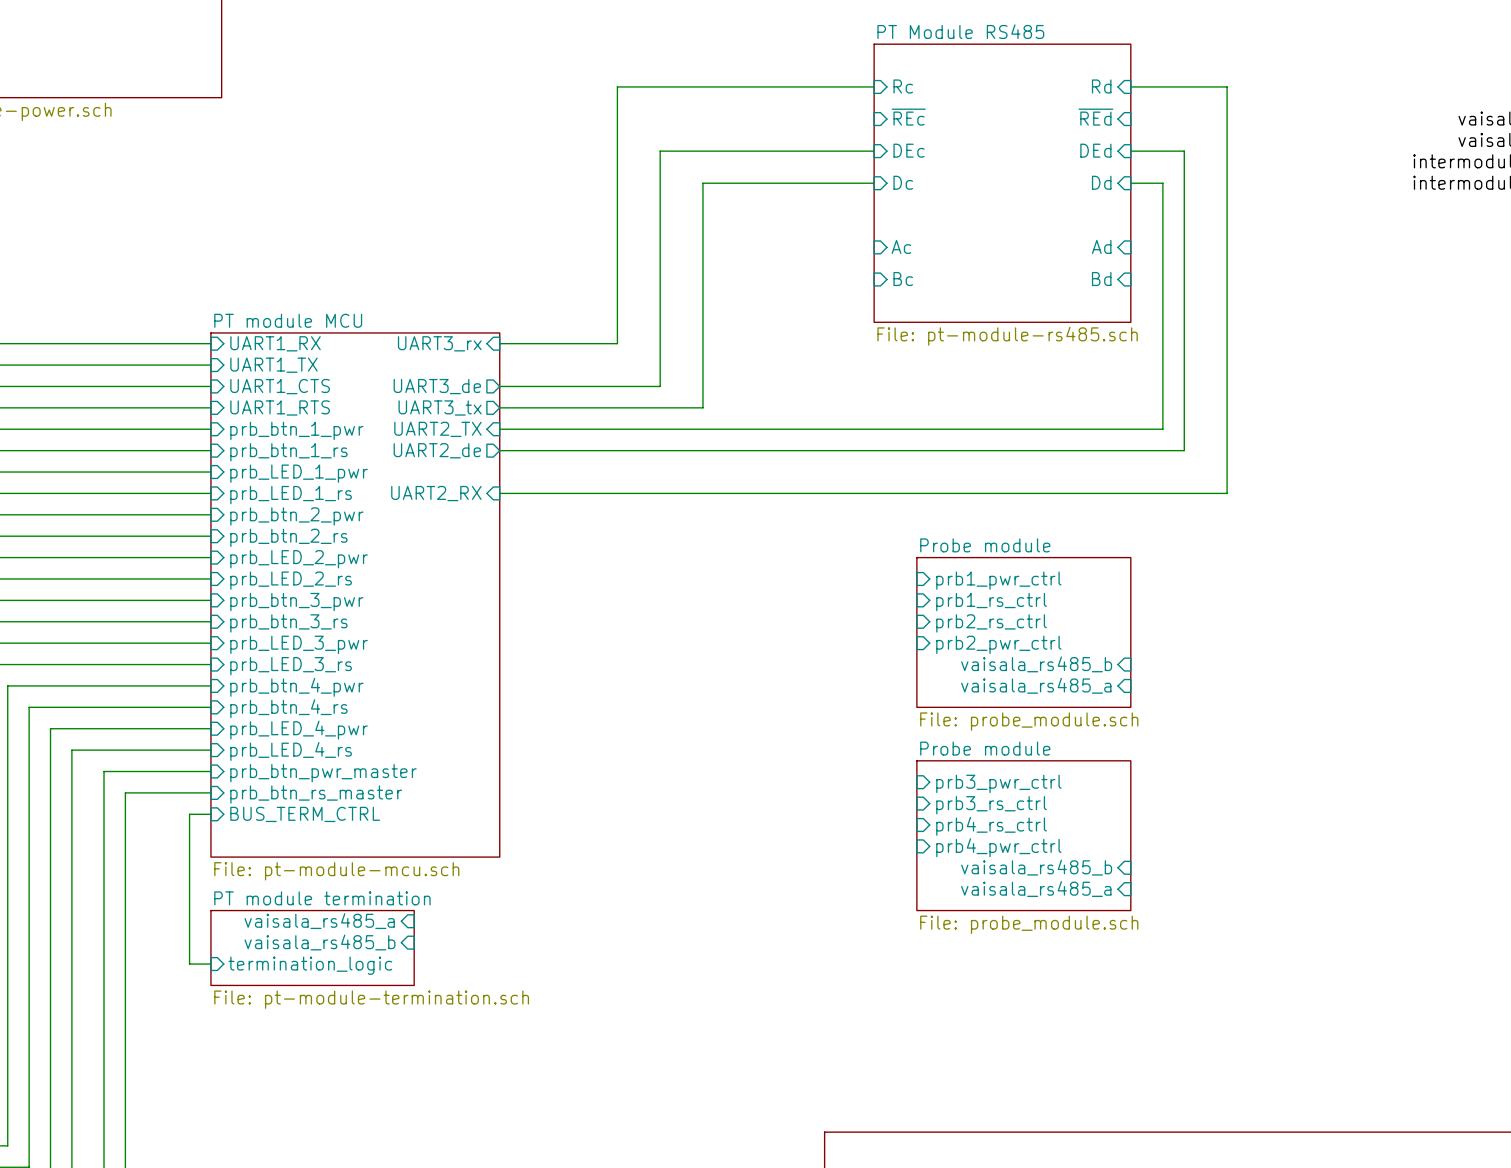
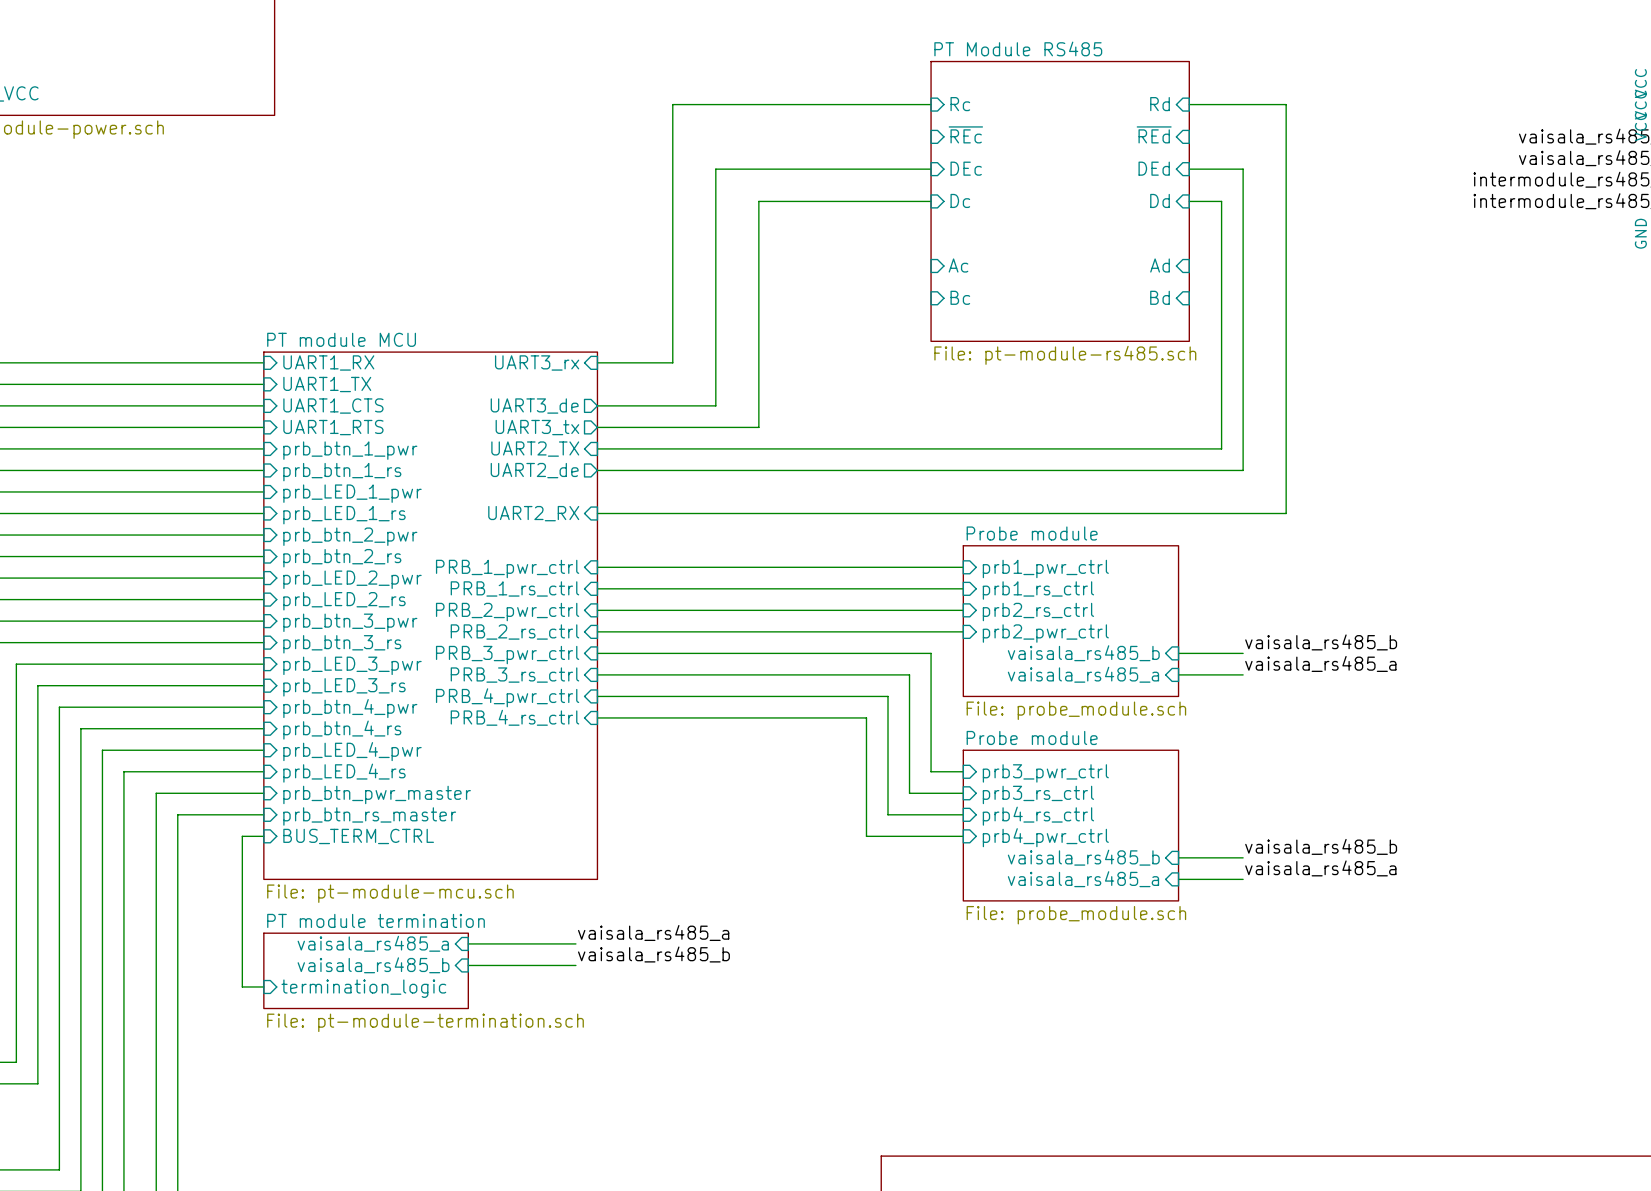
sheet pin position: UART3_rx (439, 343) -> UART3_rx (537, 362)
wire: (499, 343) (542, 343) -> none
sheet pin position: UART3_de (437, 386) -> UART3_de (534, 406)
wire: (499, 386) (542, 386) -> none
sheet pin position: UART3_tx (440, 407) -> UART3_tx (537, 427)
wire: (499, 407) (542, 407) -> none
sheet pin position: UART2_TX (437, 429) -> UART2_TX (535, 449)
wire: (499, 429) (542, 429) -> none
sheet pin position: UART2_de (437, 450) -> UART2_de (534, 470)
wire: (499, 450) (542, 450) -> none
sheet pin position: UART2_RX (436, 493) -> UART2_RX (533, 513)
wire: (499, 493) (542, 493) -> none
wire: none -> (597, 567) (963, 567)
sheet pin: none -> PRB_1_pwr_ctrl (507, 568)
sheet pin: none -> PRB_1_rs_ctrl (514, 588)
wire: none -> (597, 588) (963, 588)
sheet pin position: prb1_pwr_ctrl (998, 580) -> prb1_pwr_ctrl (1045, 568)
wire: none -> (597, 610) (963, 610)
sheet pin: none -> PRB_2_pwr_ctrl (507, 612)
sheet PT module MCU: File: pt-module-mcu.sch (355, 595) -> none
sheet PT module MCU: none -> File: pt-module-mcu.sch (430, 615)
sheet pin position: prb1_rs_ctrl (991, 602) -> prb1_rs_ctrl (1038, 590)
sheet pin: none -> PRB_2_rs_ctrl (514, 632)
wire: none -> (597, 631) (963, 631)
label: none -> vaisala_rs485_b (1321, 642)
sheet pin position: prb2_rs_ctrl (991, 623) -> prb2_rs_ctrl (1038, 612)
wire: none -> (597, 653) (931, 653) (931, 771) (963, 771)
sheet Probe module position: (1023, 632) -> (1070, 621)
wire: none -> (1178, 653) (1243, 653)
sheet pin: none -> PRB_3_pwr_ctrl (507, 655)
label: none -> vaisala_rs485_a (1320, 663)
sheet pin position: prb2_pwr_ctrl (998, 644) -> prb2_pwr_ctrl (1045, 633)
sheet pin: none -> PRB_3_rs_ctrl (514, 675)
wire: none -> (597, 674) (909, 674) (909, 793) (963, 793)
wire: none -> (1178, 674) (1243, 674)
sheet pin position: vaisala_rs485_b (1036, 664) -> vaisala_rs485_b (1083, 653)
wire: none -> (597, 696) (888, 696) (888, 814) (963, 814)
sheet pin: none -> PRB_4_pwr_ctrl (507, 697)
sheet pin position: vaisala_rs485_a (1036, 685) -> vaisala_rs485_a (1083, 674)
sheet pin: none -> PRB_4_rs_ctrl (514, 717)
wire: none -> (597, 717) (866, 717) (866, 836) (963, 836)
sheet pin position: prb3_pwr_ctrl (998, 783) -> prb3_pwr_ctrl (1045, 773)
sheet pin position: prb3_rs_ctrl (991, 805) -> prb3_rs_ctrl (1038, 794)
label: none -> vaisala_rs485_b (1321, 846)
sheet pin position: prb4_rs_ctrl (991, 826) -> prb4_rs_ctrl (1038, 816)
sheet Probe module position: (1023, 835) -> (1070, 825)
wire: none -> (1178, 857) (1243, 857)
label: none -> vaisala_rs485_a (1320, 868)
sheet pin position: prb4_pwr_ctrl (998, 847) -> prb4_pwr_ctrl (1045, 837)
wire: none -> (1178, 879) (1243, 879)
sheet pin position: vaisala_rs485_b (1036, 867) -> vaisala_rs485_b (1083, 857)
sheet pin position: vaisala_rs485_a (1036, 888) -> vaisala_rs485_a (1083, 879)
label: none -> vaisala_rs485_a (653, 932)
wire: none -> (468, 943) (575, 943)
label: none -> vaisala_rs485_b (653, 954)
wire: none -> (468, 965) (575, 965)

